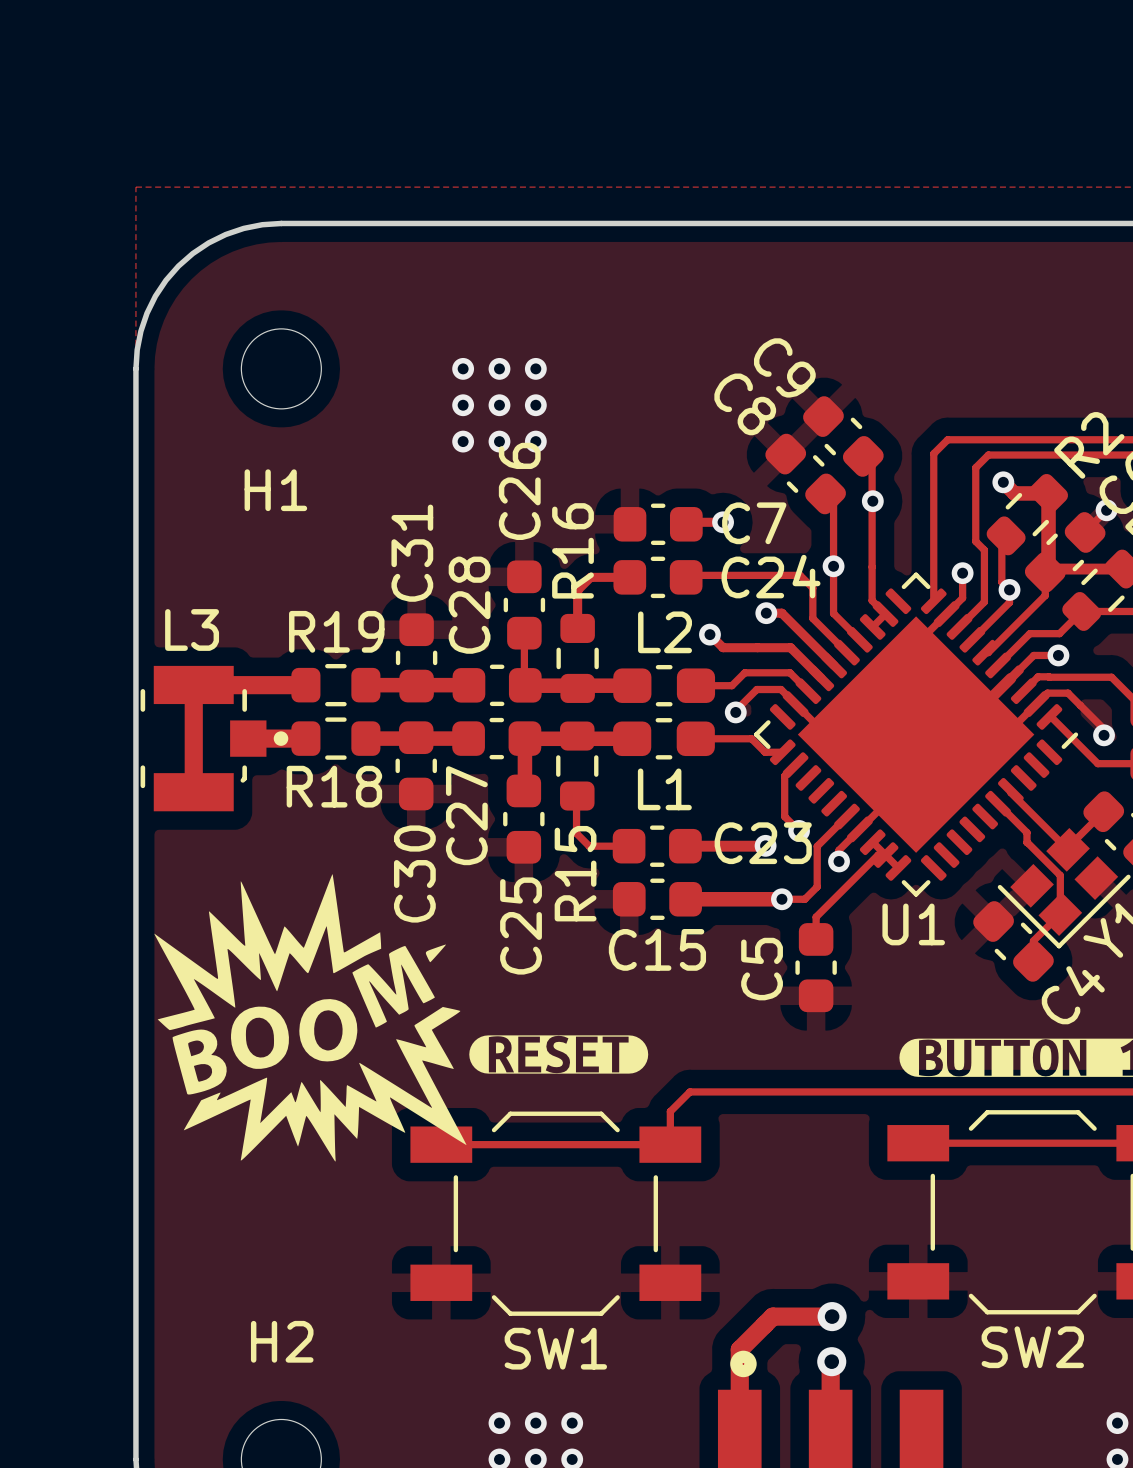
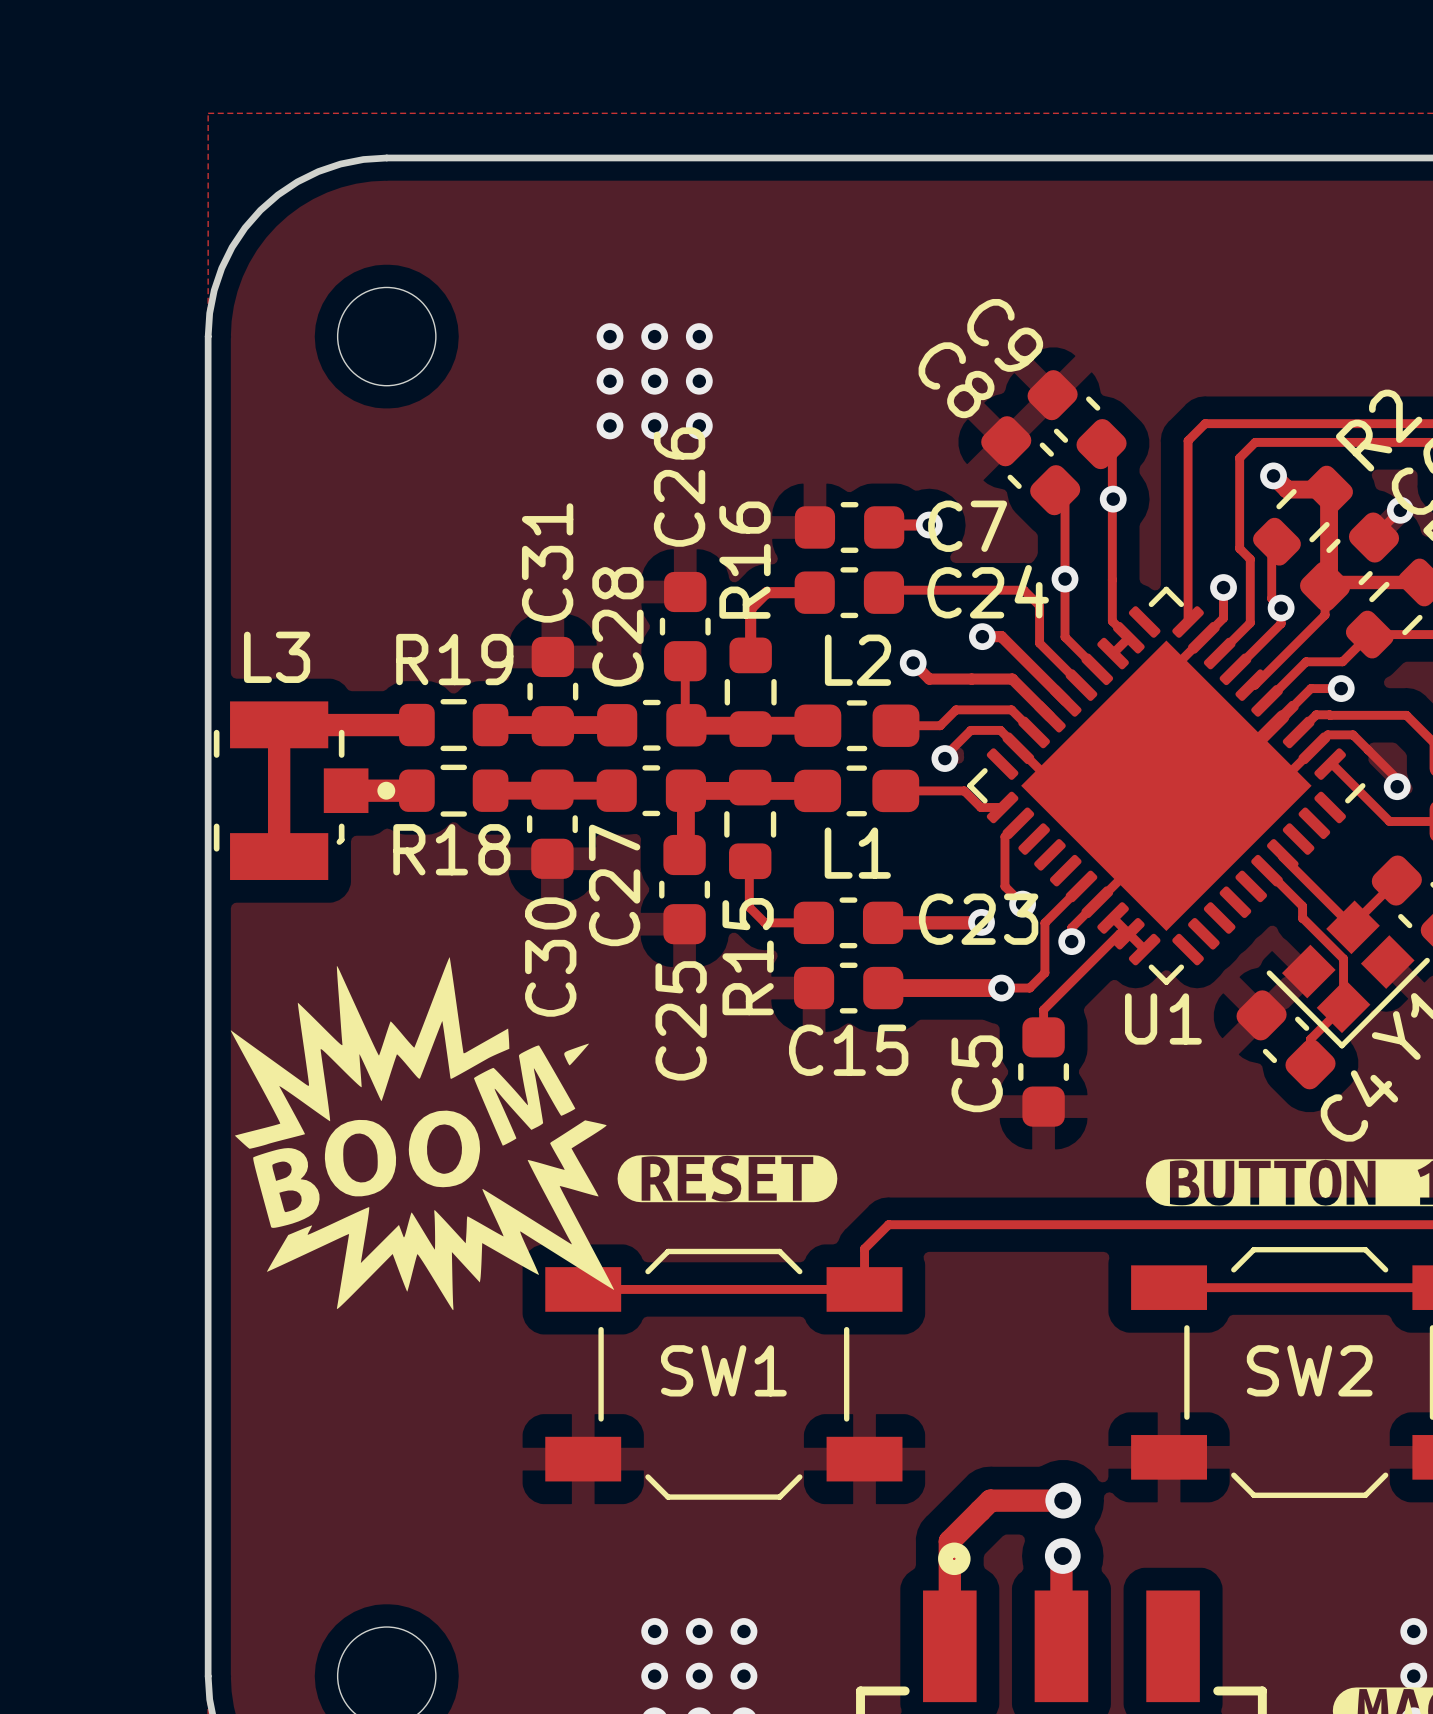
H1 name: H1 (275, 490) -> none
H2 name: H2 (282, 1341) -> none
SW2 name position: SW2 (1032, 1347) -> SW2 (1309, 1370)
SW1 name position: SW1 (555, 1348) -> SW1 (723, 1370)

